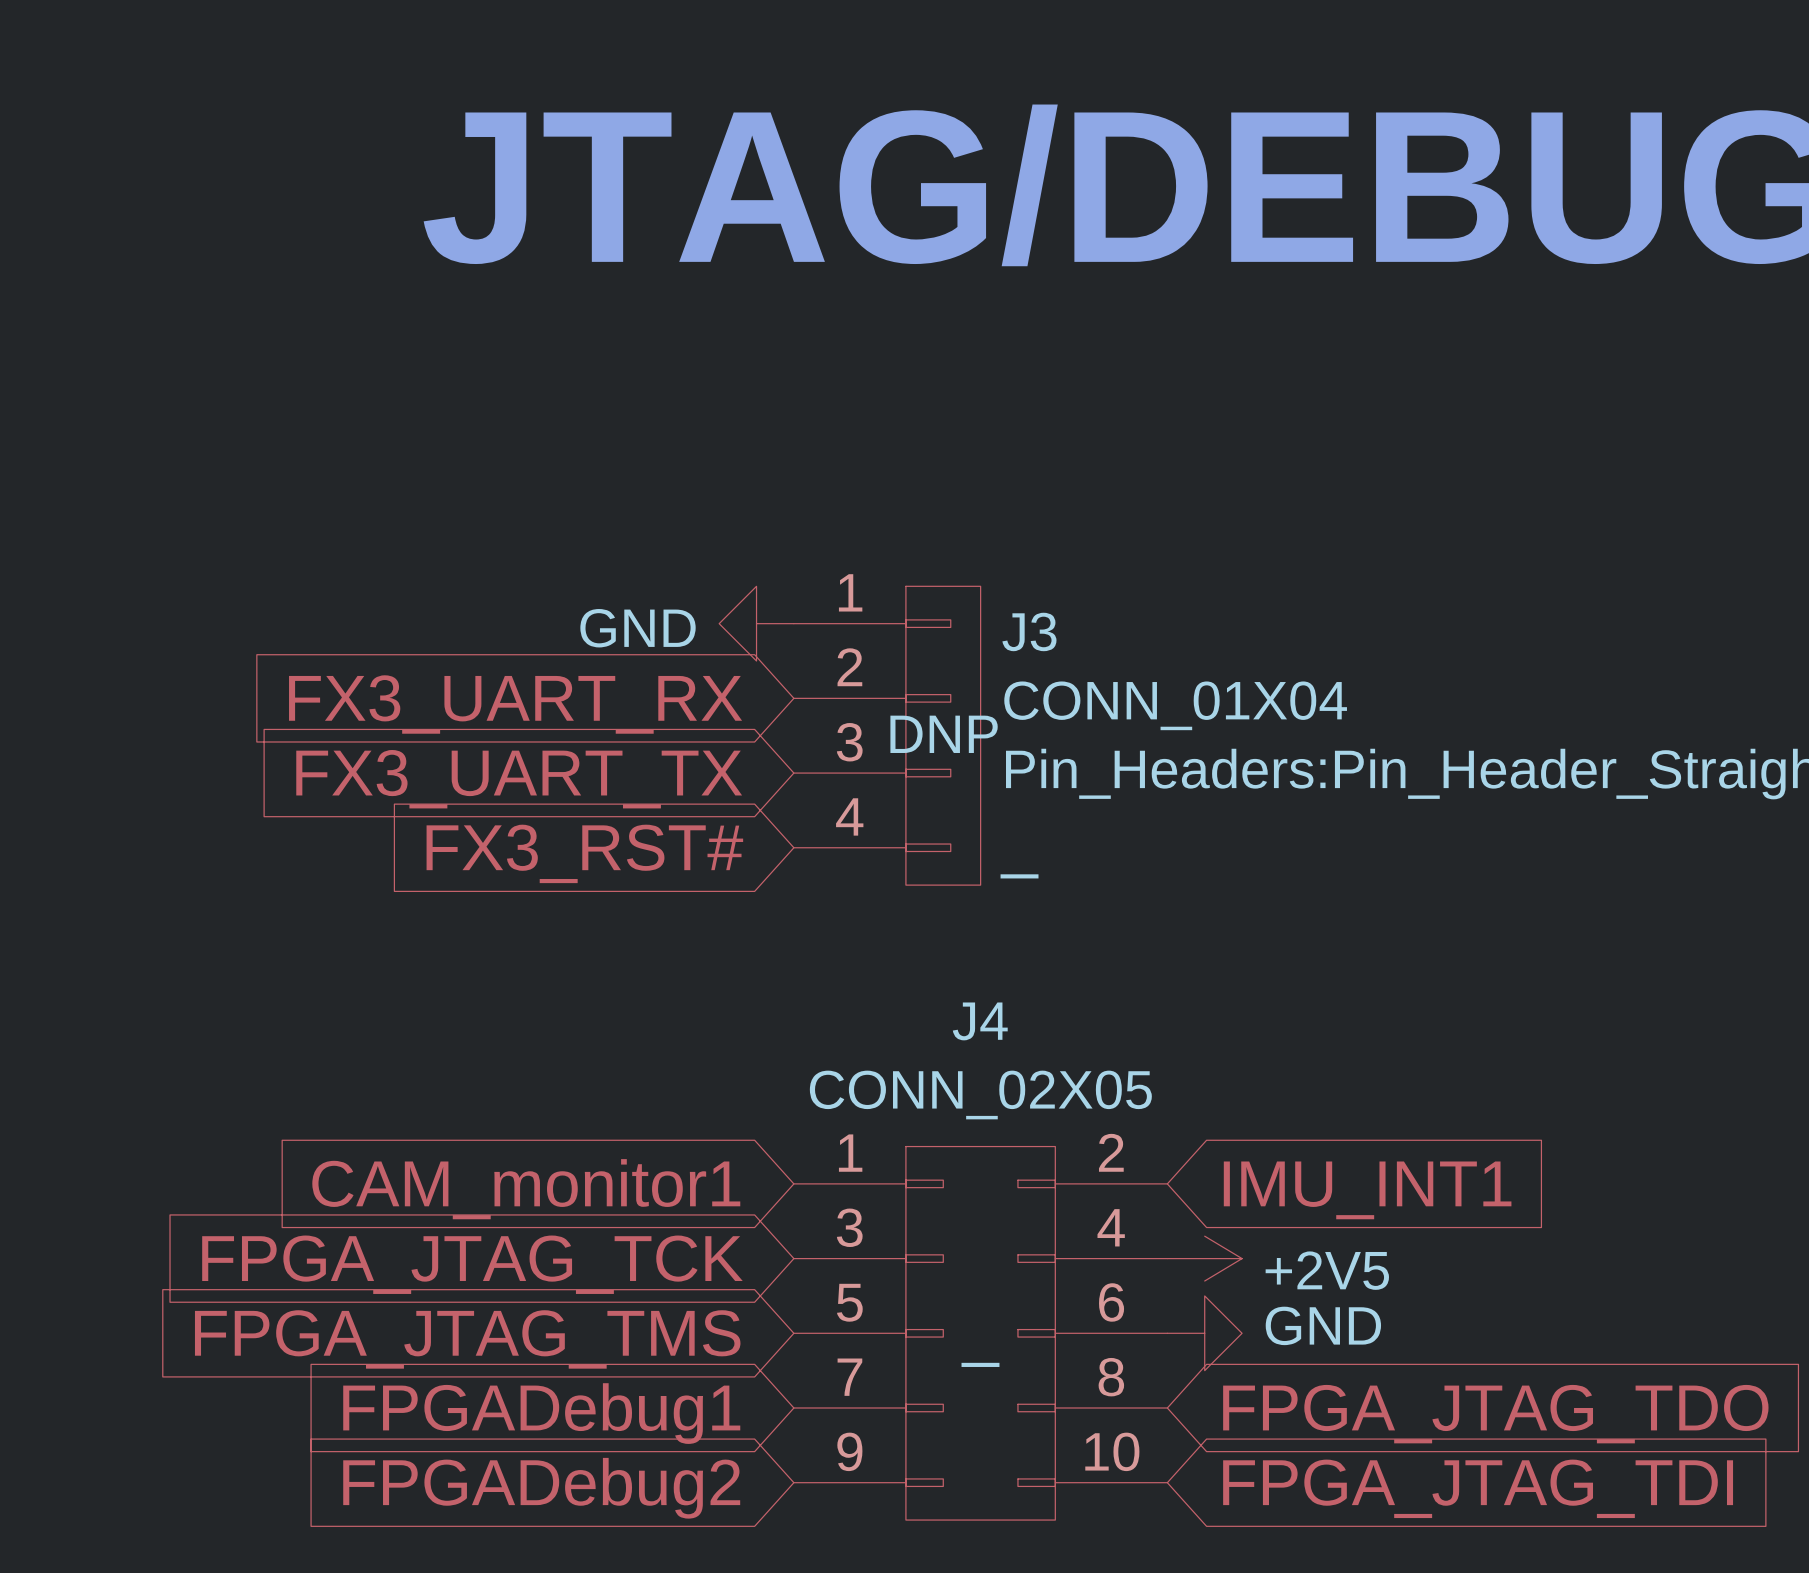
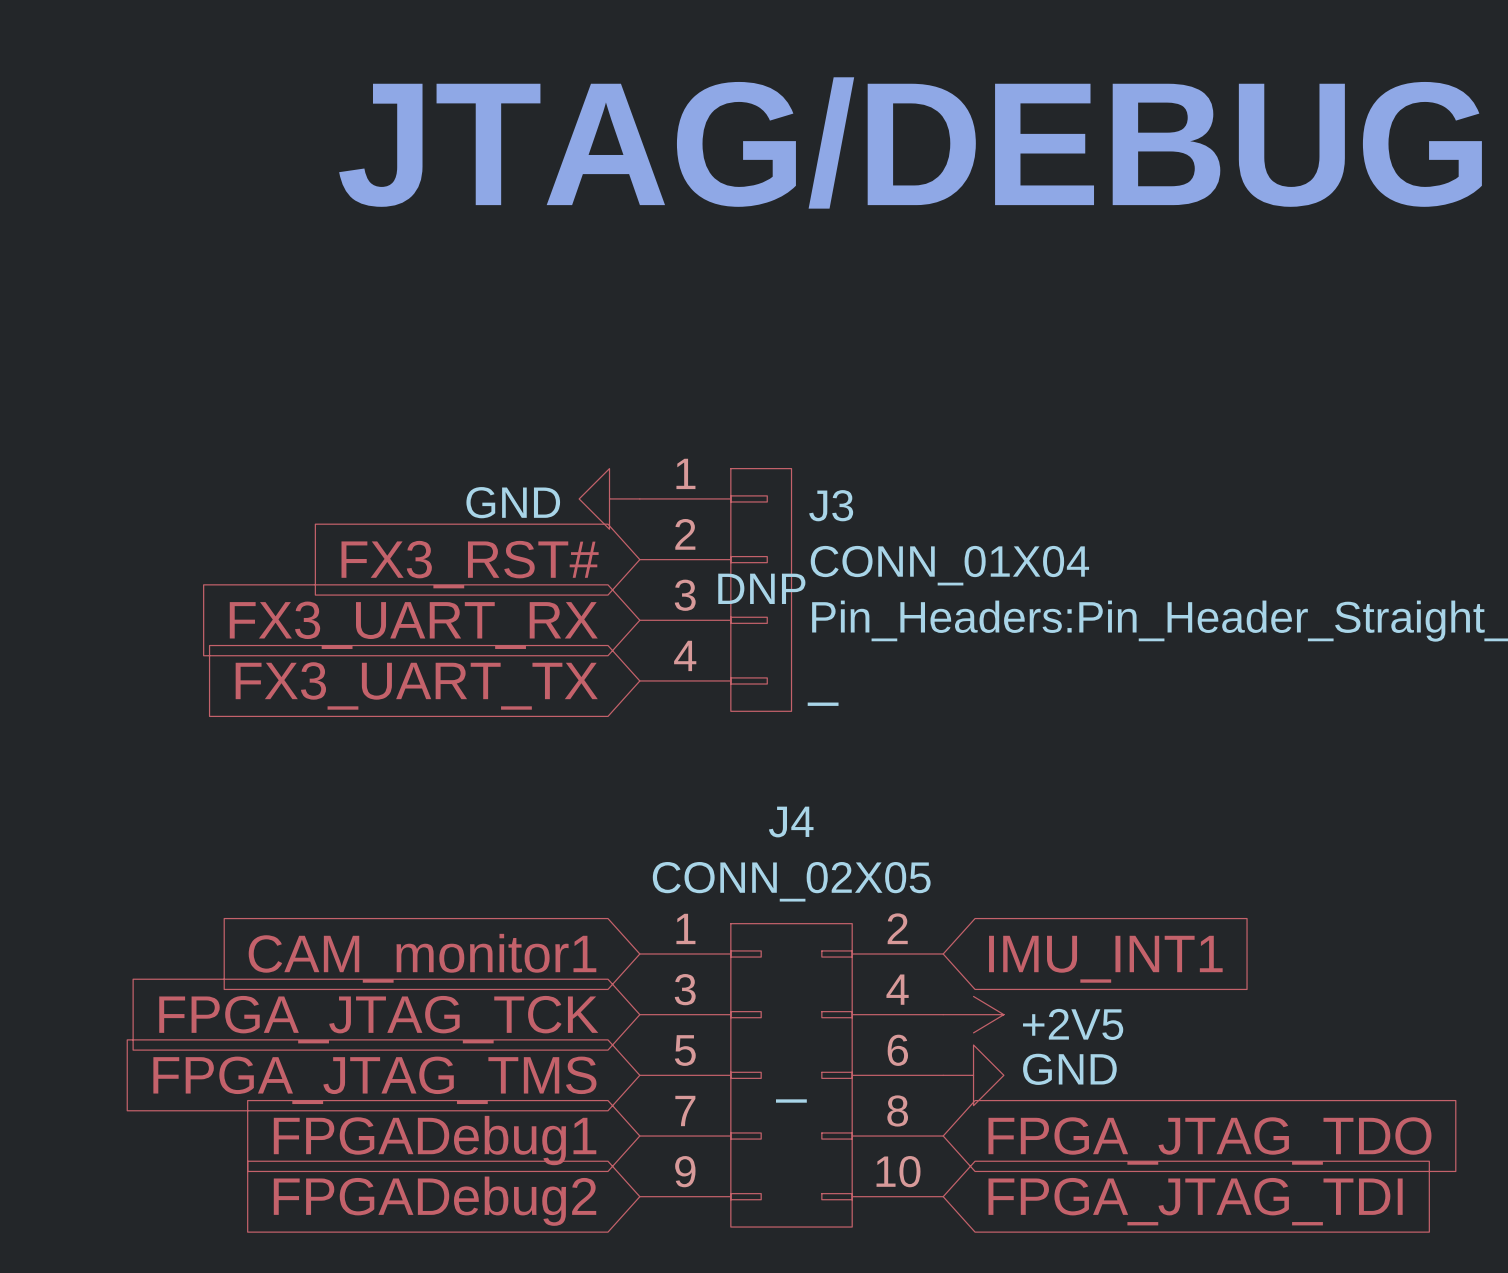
global label: FX3_UART_RX (515, 704) -> FX3_RST# (470, 564)
global label: FX3_UART_TX (519, 779) -> FX3_UART_RX (413, 625)
global label: FX3_RST# (584, 853) -> FX3_UART_TX (416, 685)

